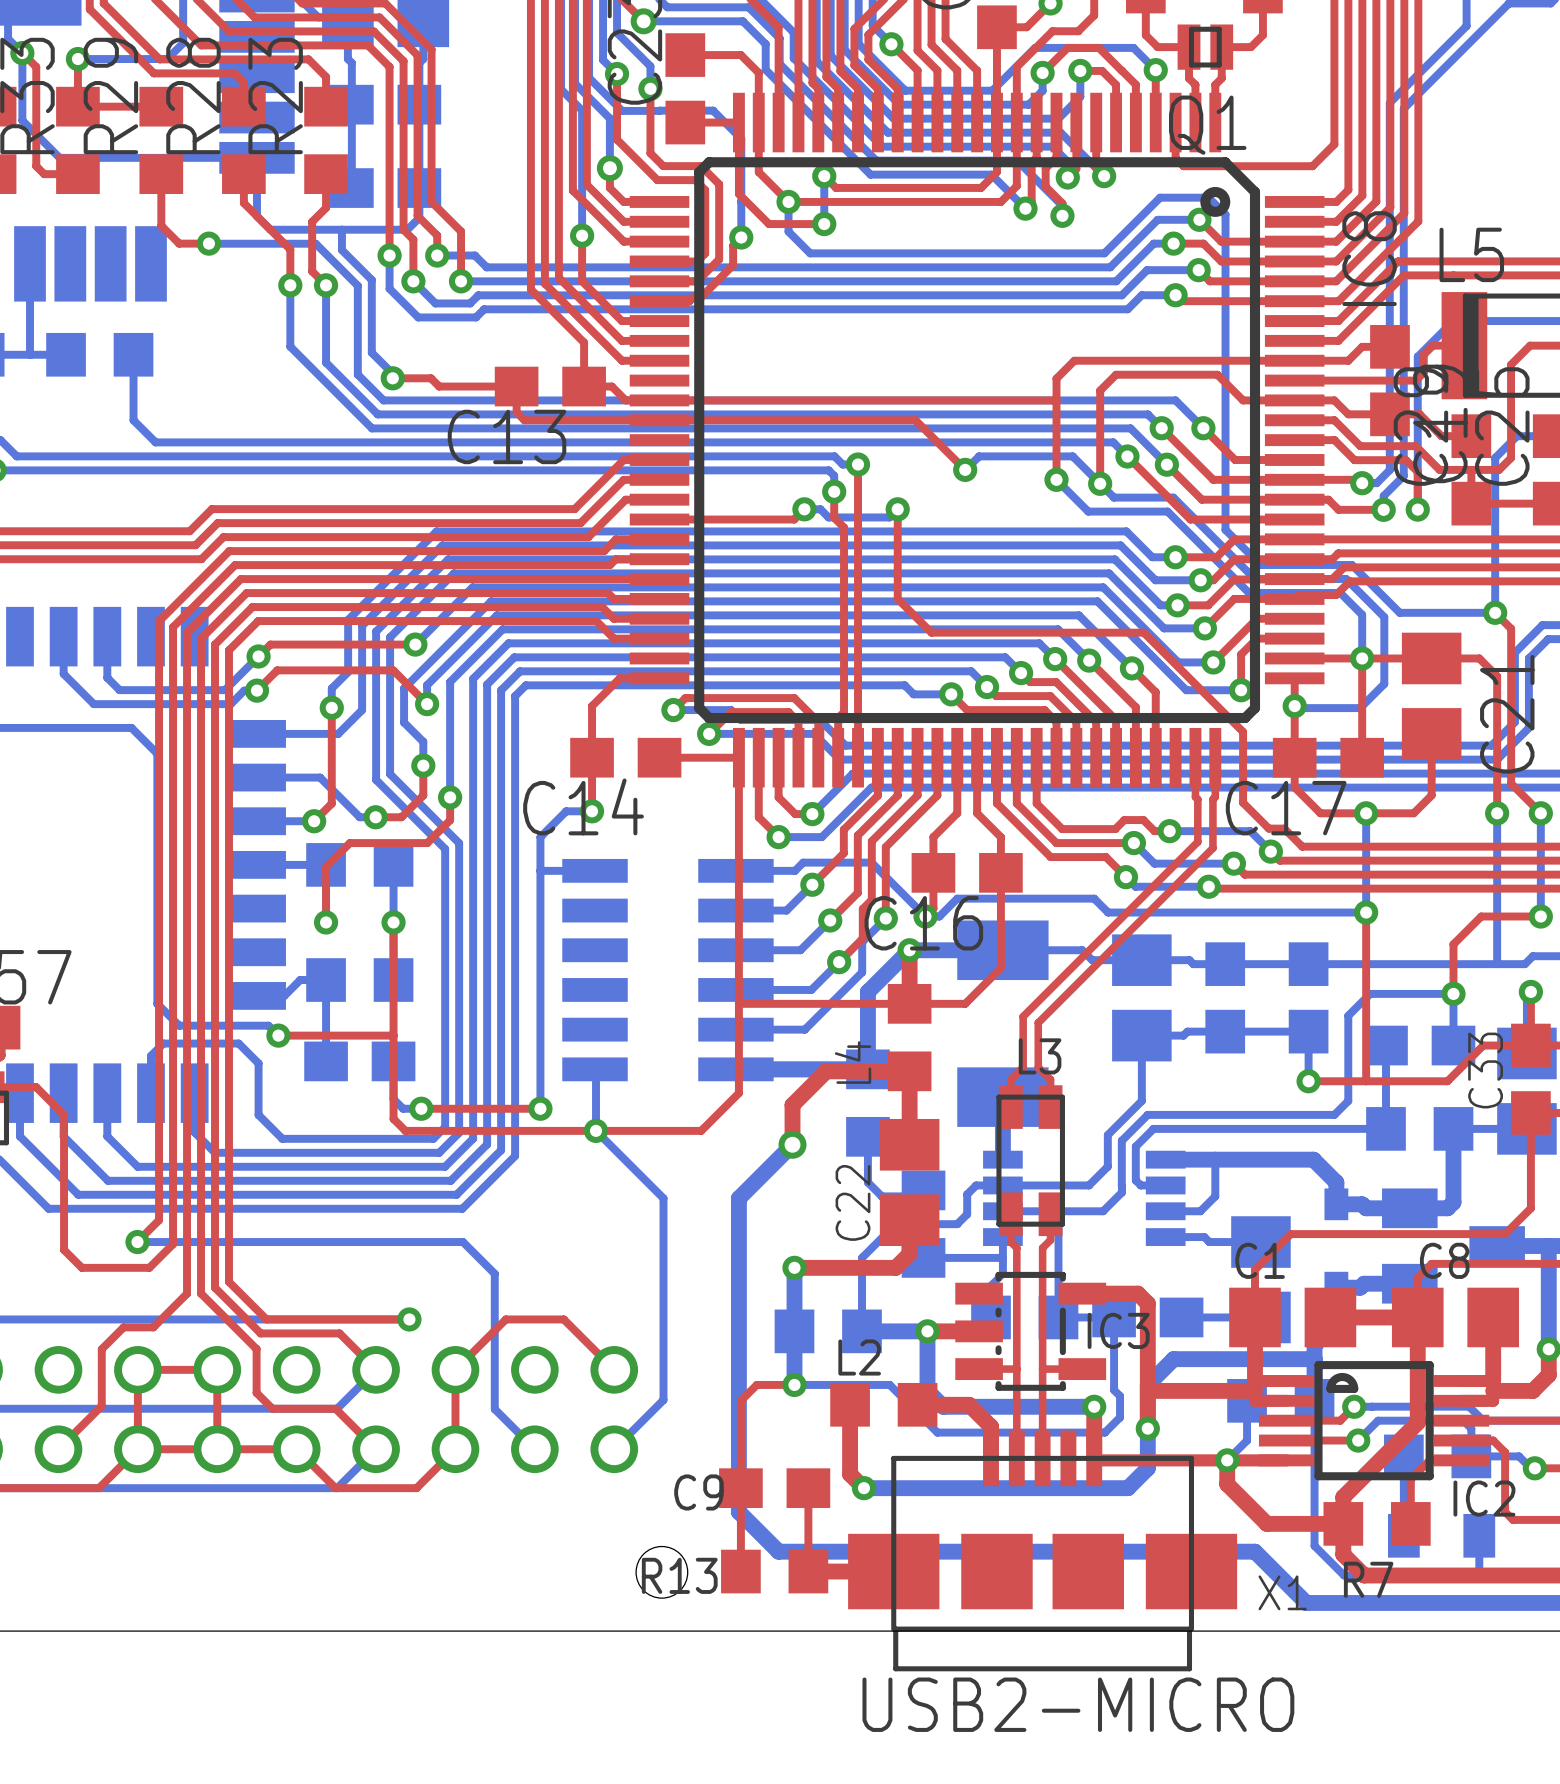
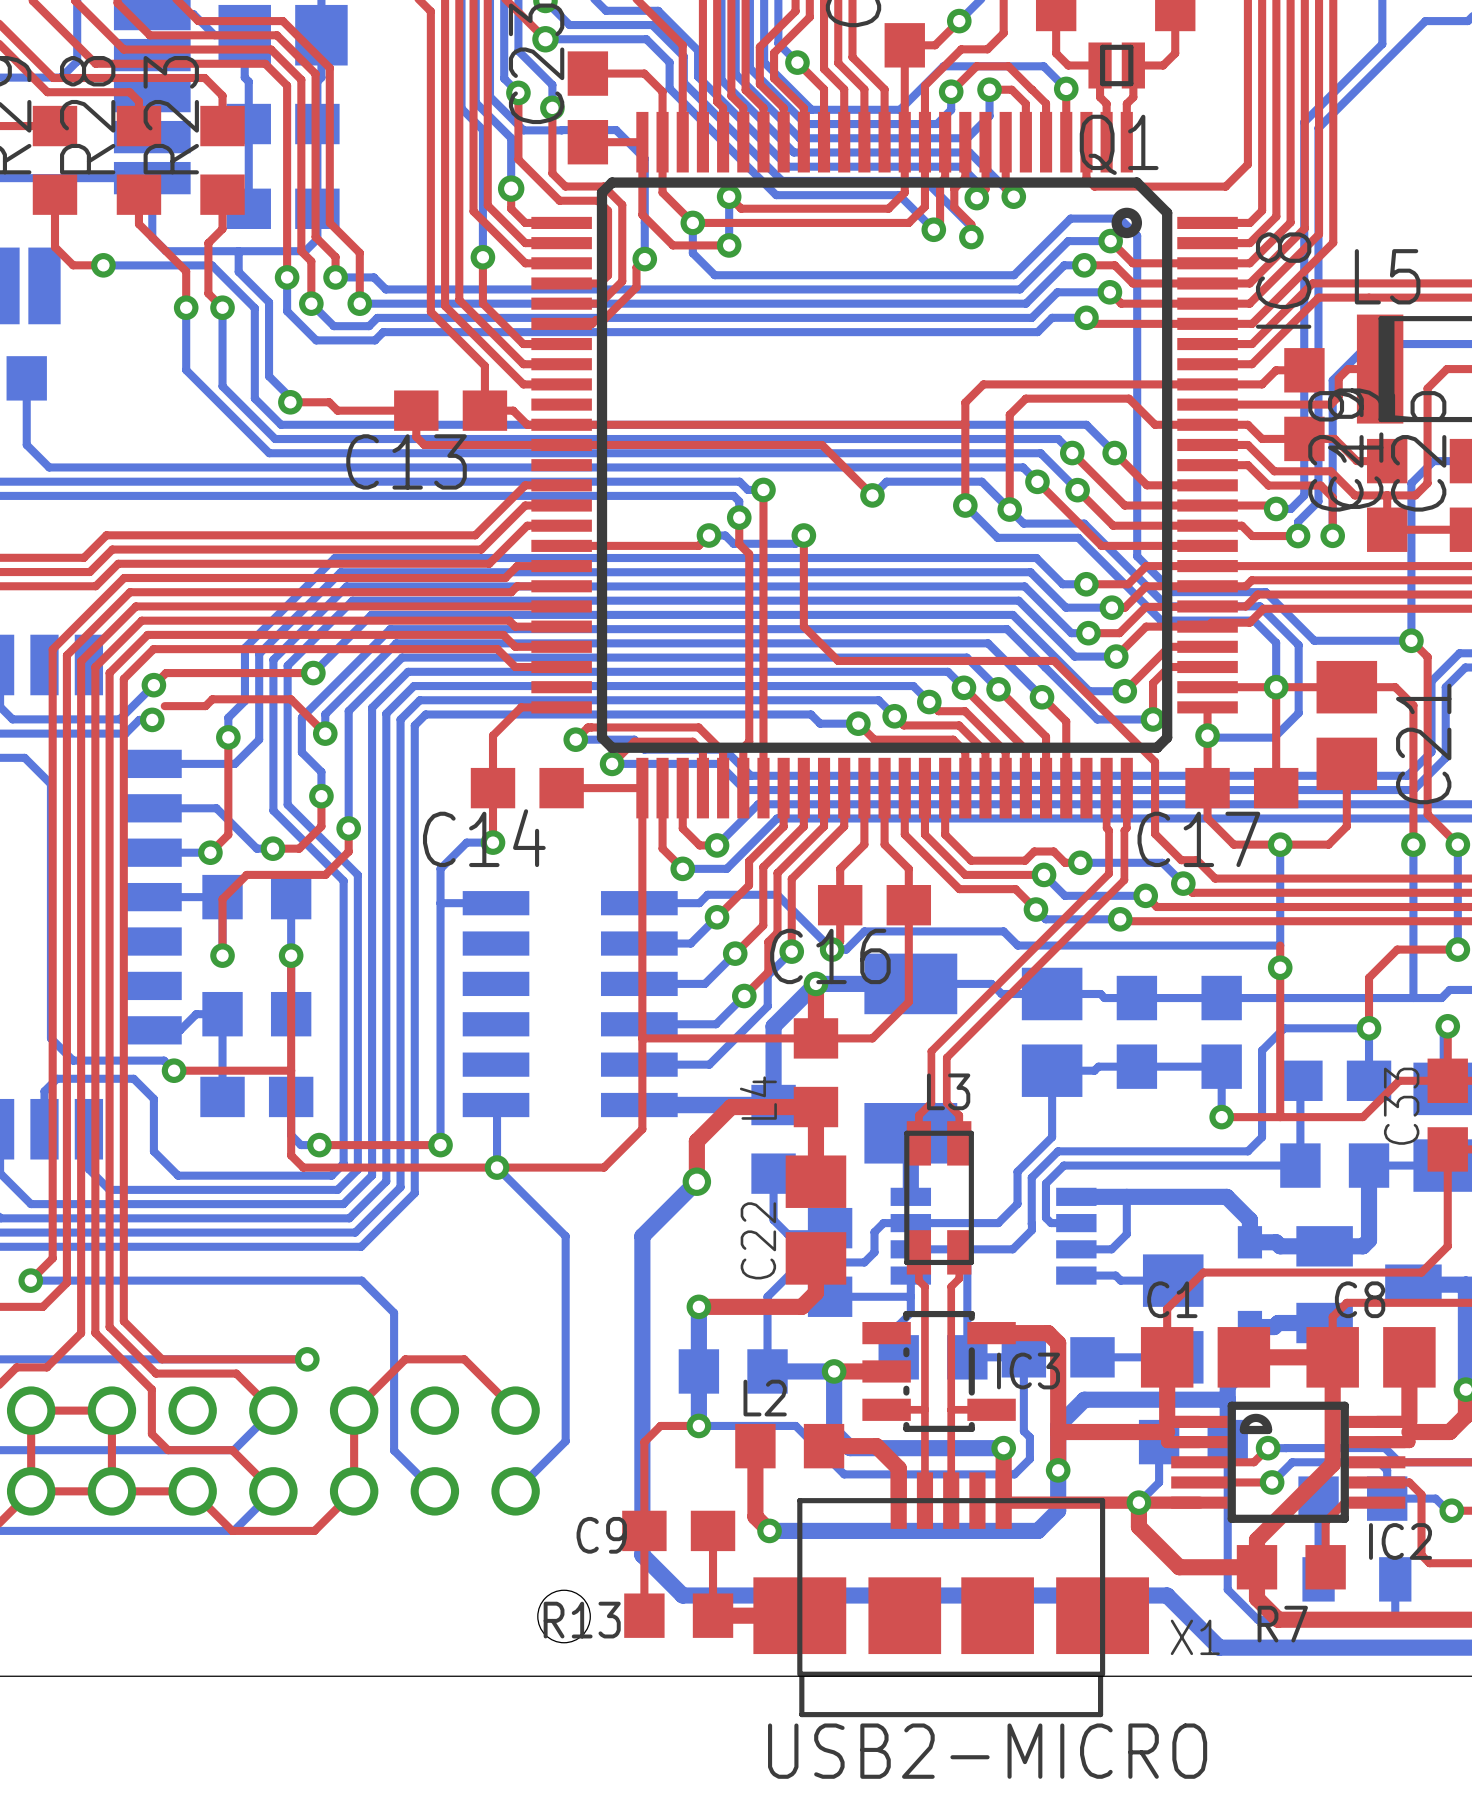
top track: (316, 670) (277, 670) (256, 690) -> (212, 699) (205, 706) (164, 706)
via position: (1366, 912) -> (1280, 967)

